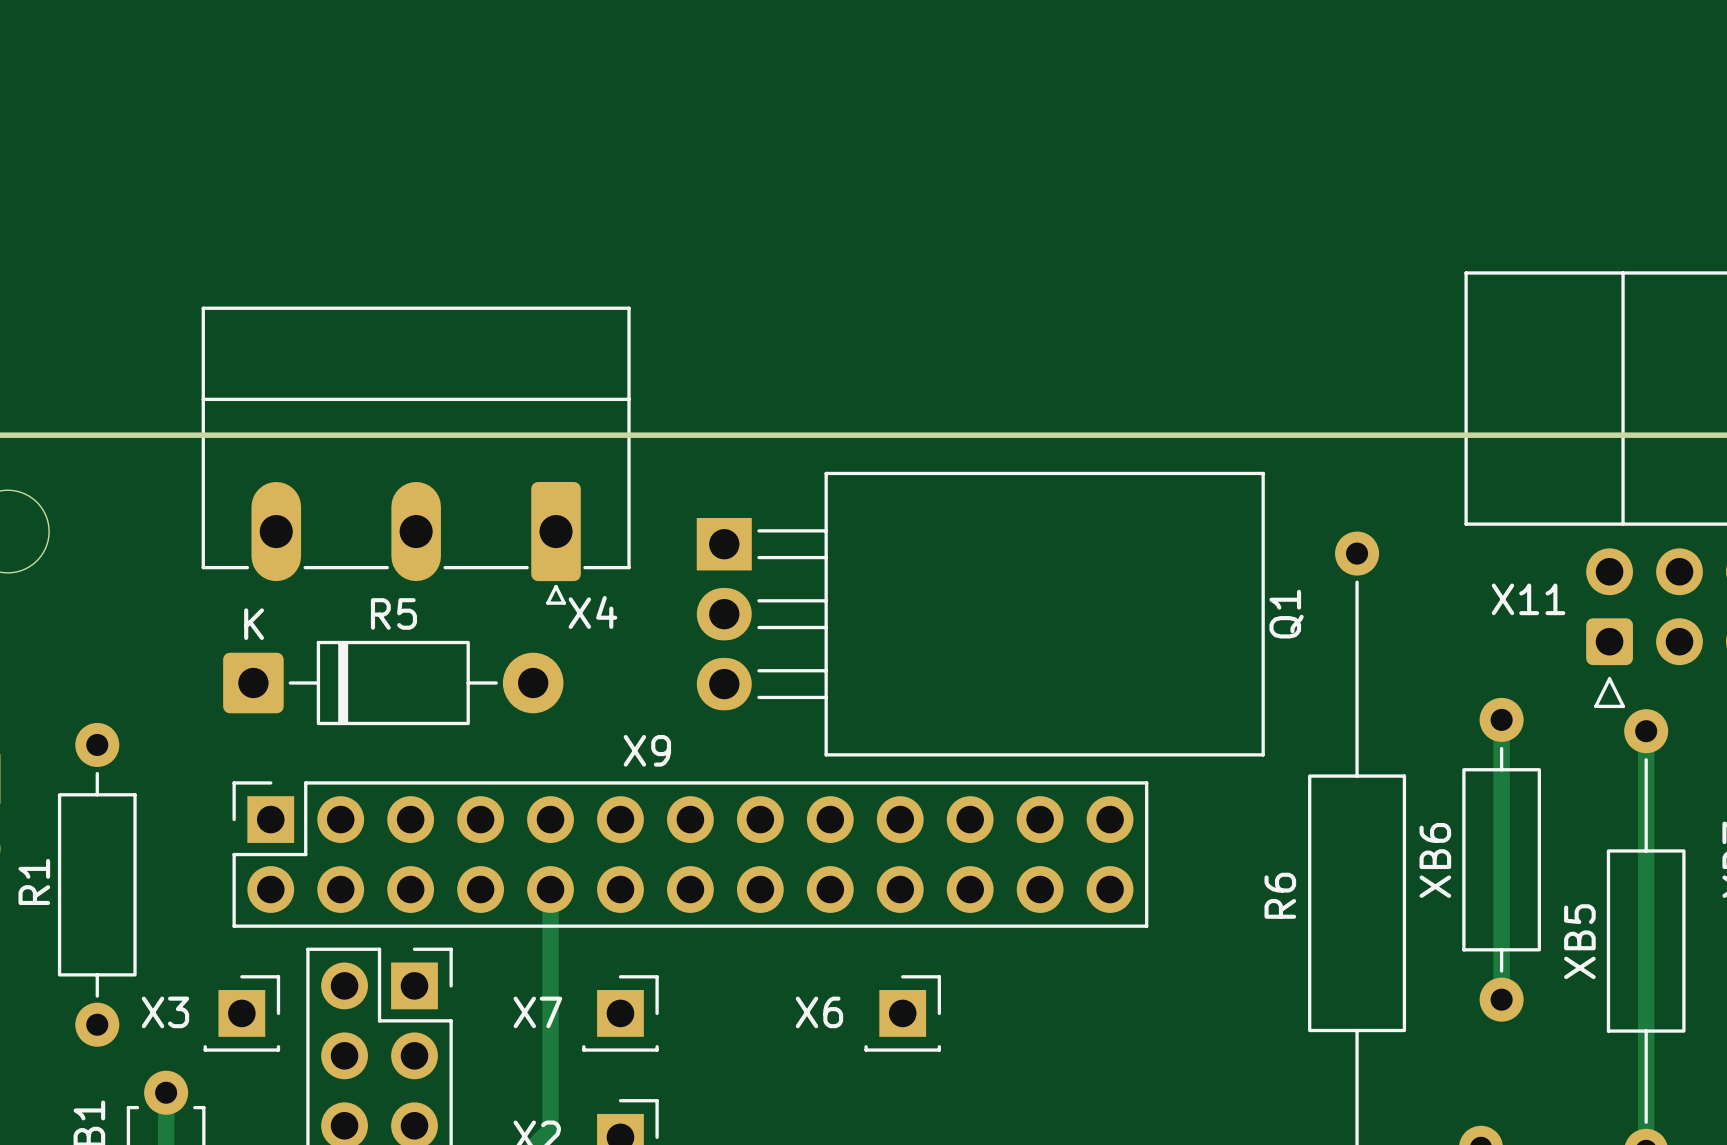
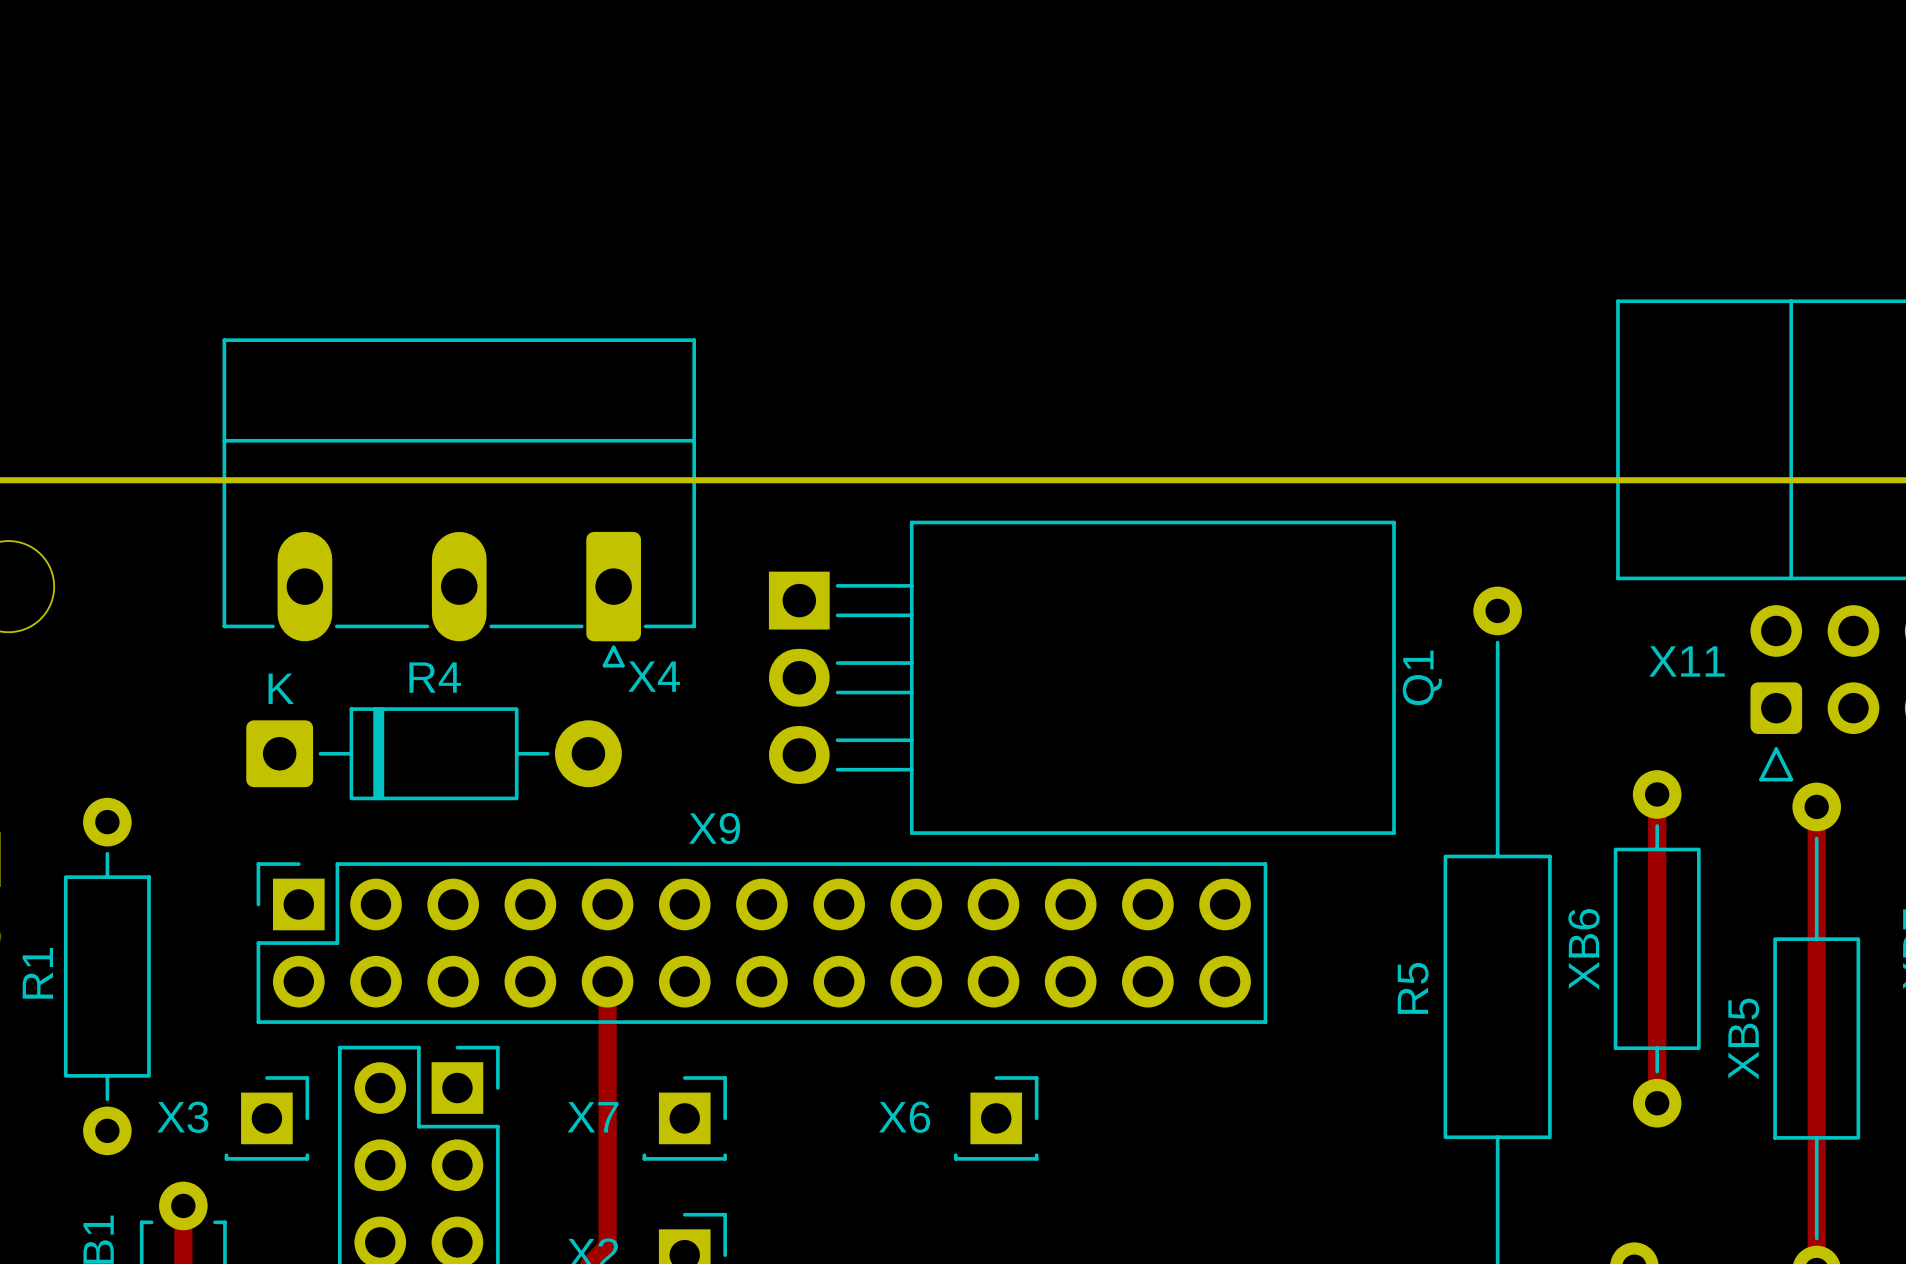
R5 name: R5 (393, 613) -> R4 (435, 677)
R6 name: R6 (1280, 895) -> R5 (1413, 988)

